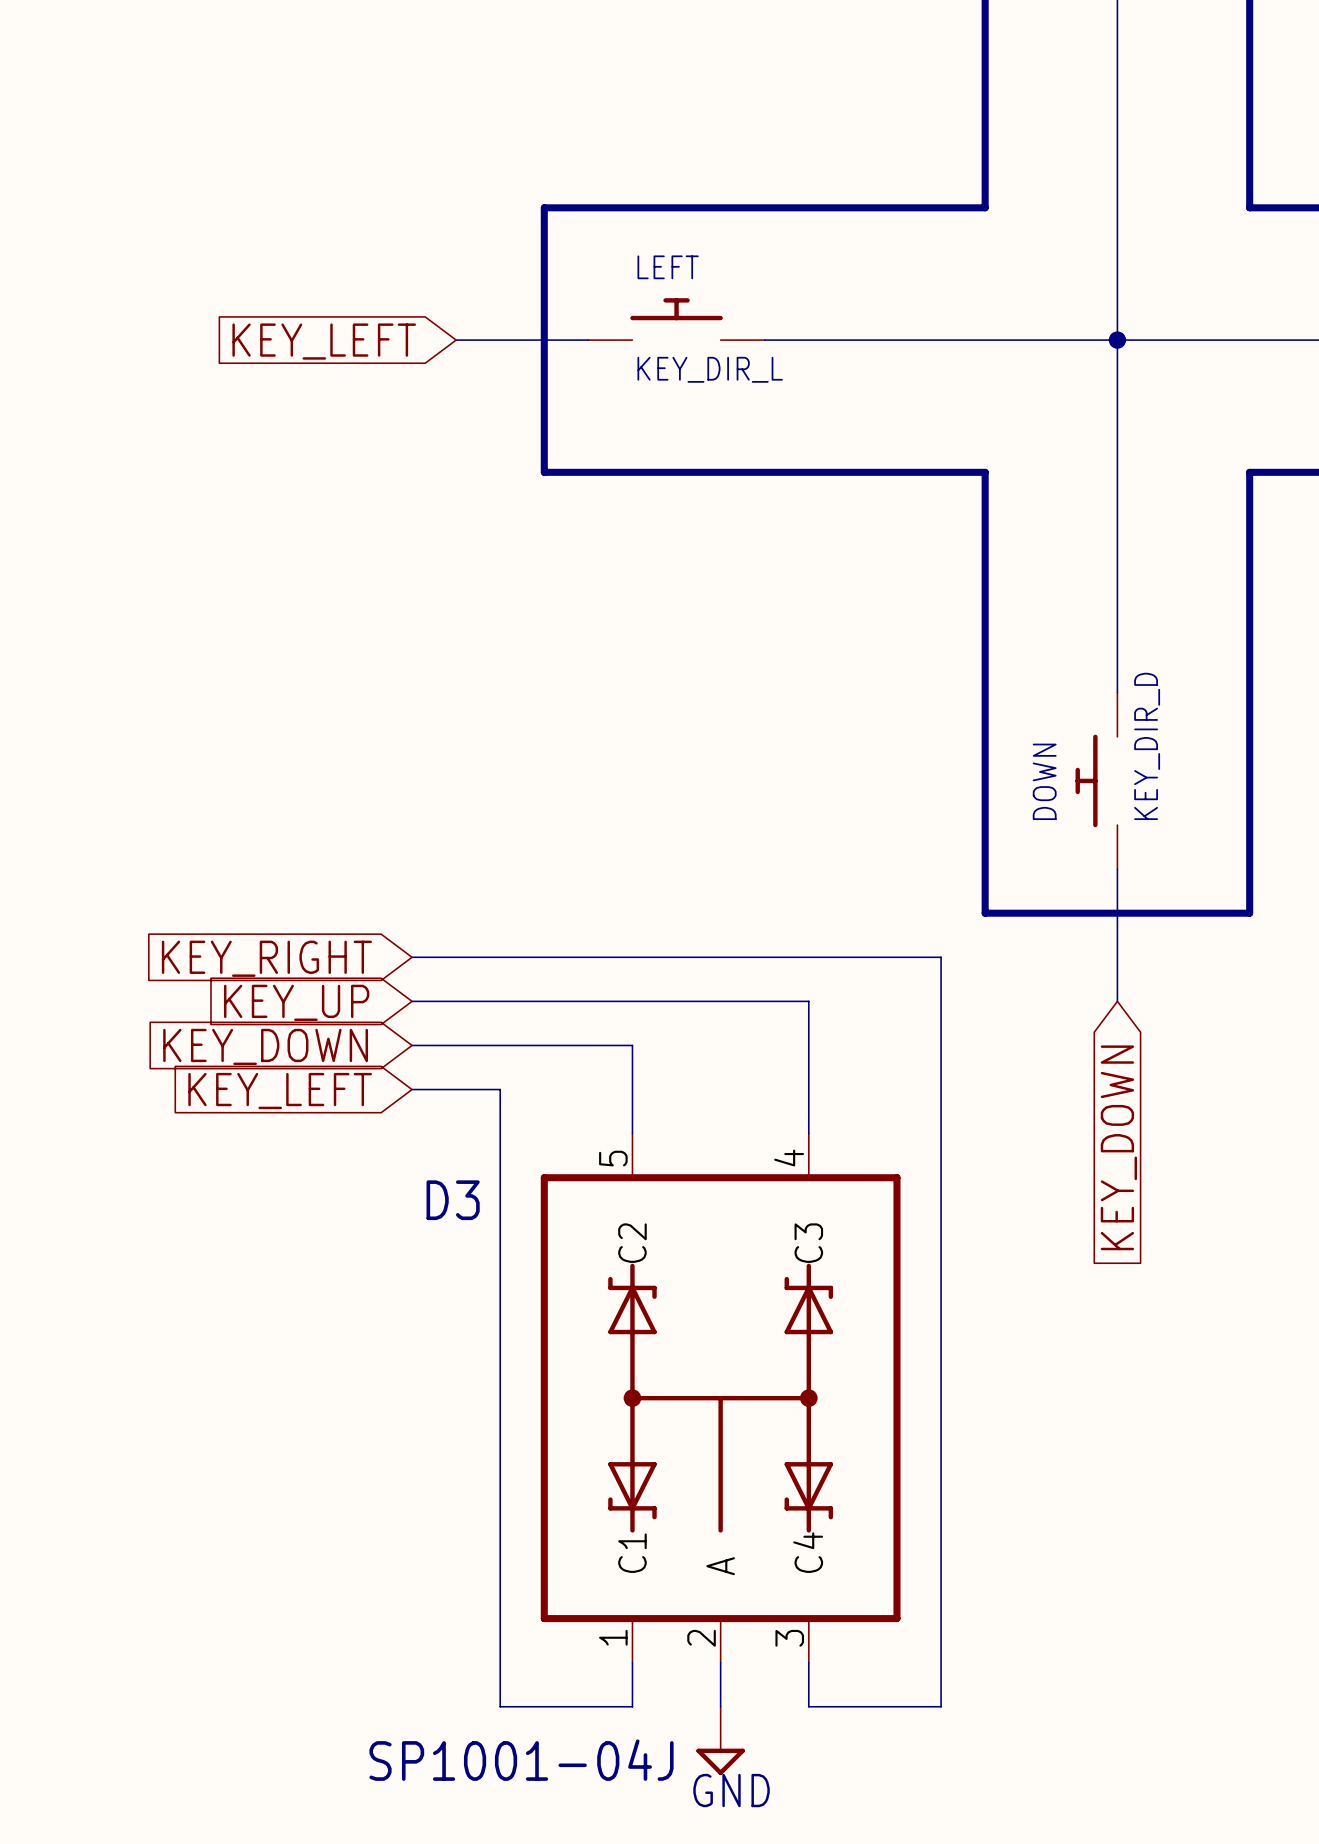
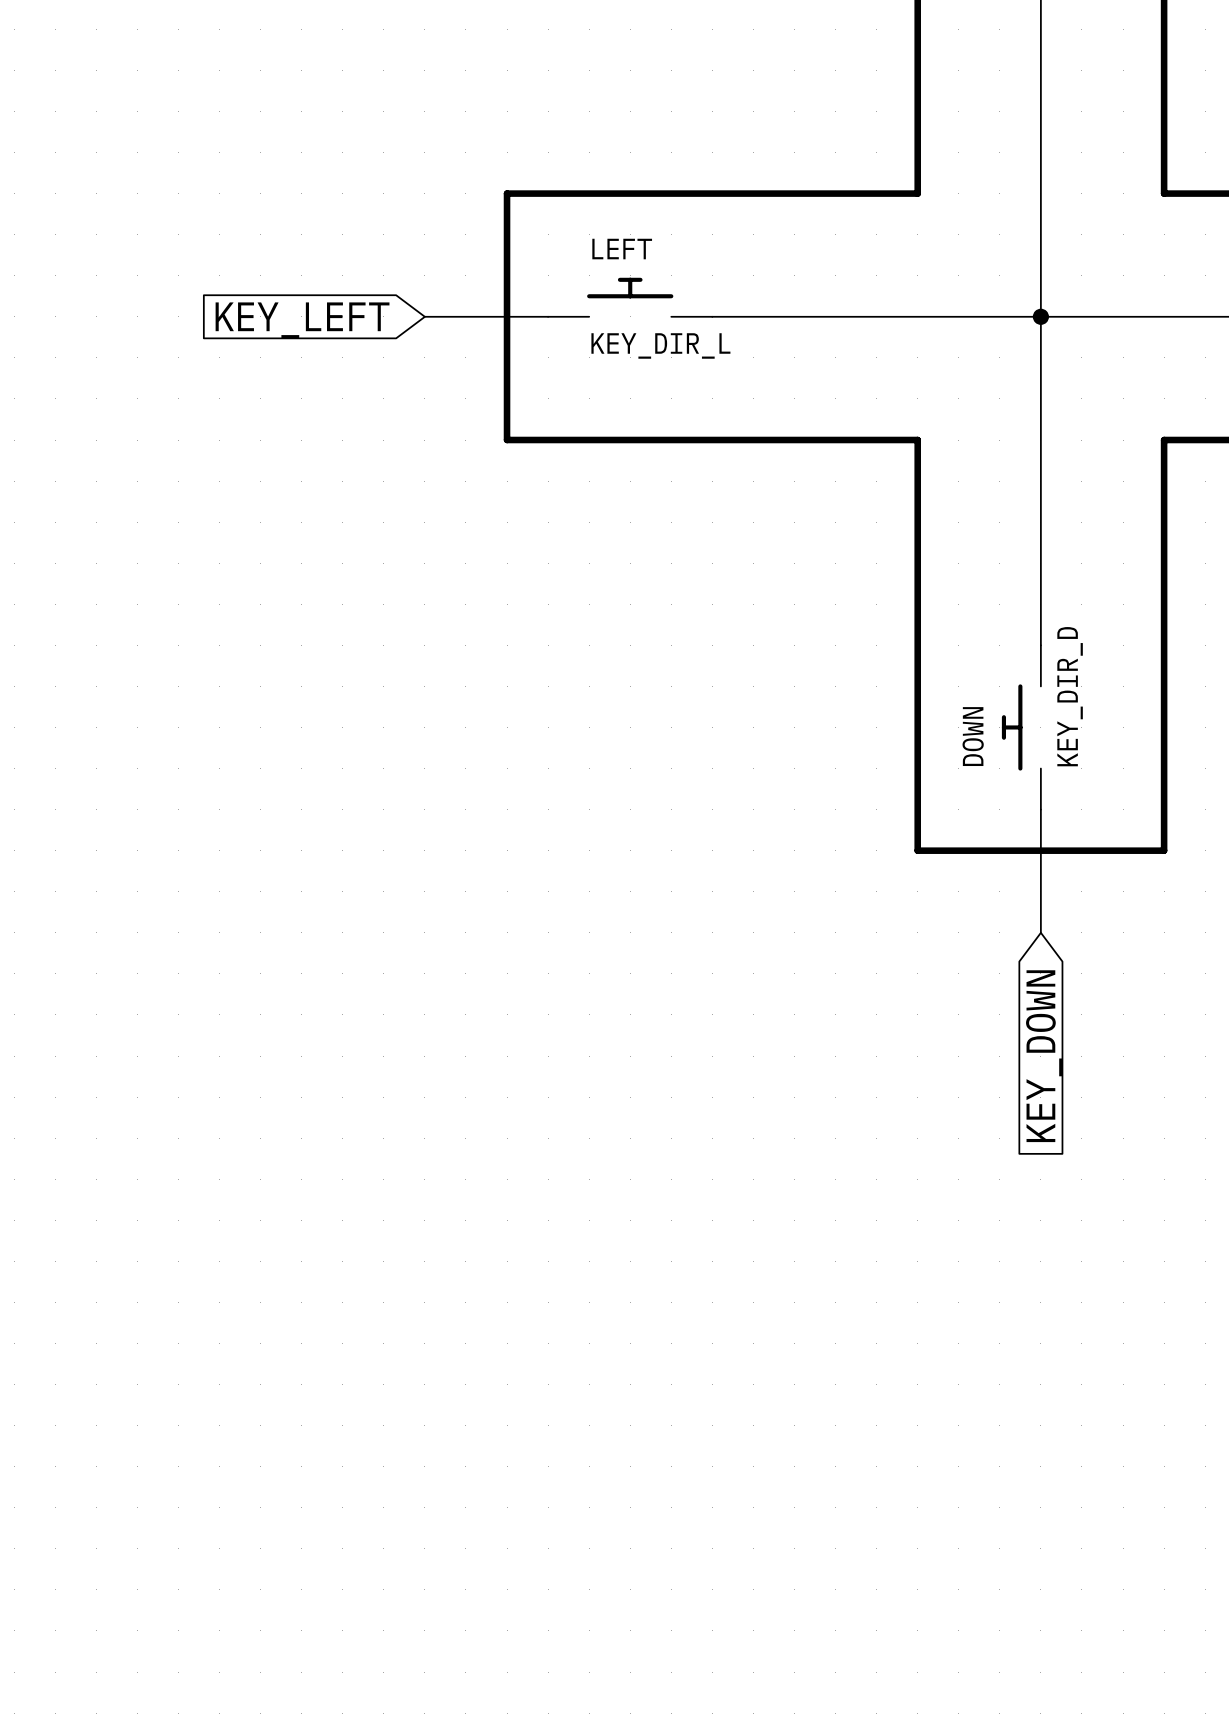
wire: (412, 957) (941, 957) (941, 1706) (808, 1706) (808, 1662) -> none
global label: KEY_RIGHT (266, 958) -> none
wire: (412, 1001) (808, 1001) (808, 1133) -> none
global label: KEY_UP (296, 1002) -> none
wire: (412, 1045) (632, 1045) (632, 1133) -> none
global label: KEY_DOWN (265, 1046) -> none
wire: (412, 1089) (500, 1089) (500, 1706) (632, 1706) (632, 1662) -> none
global label: KEY_LEFT (280, 1091) -> none
D3: SP1001-04J (720, 1398) -> none
wire: (720, 1662) (720, 1706) -> none
power symbol: GND (720, 1740) -> none

